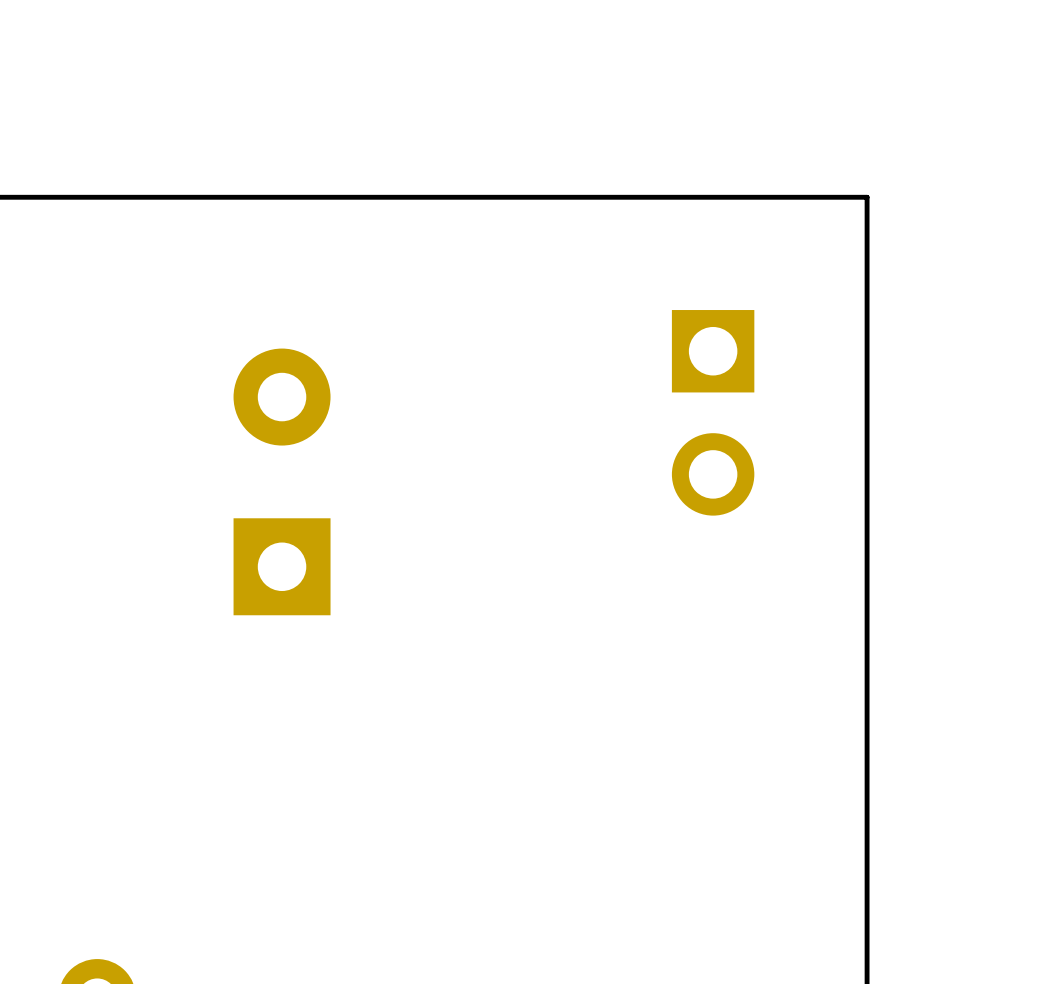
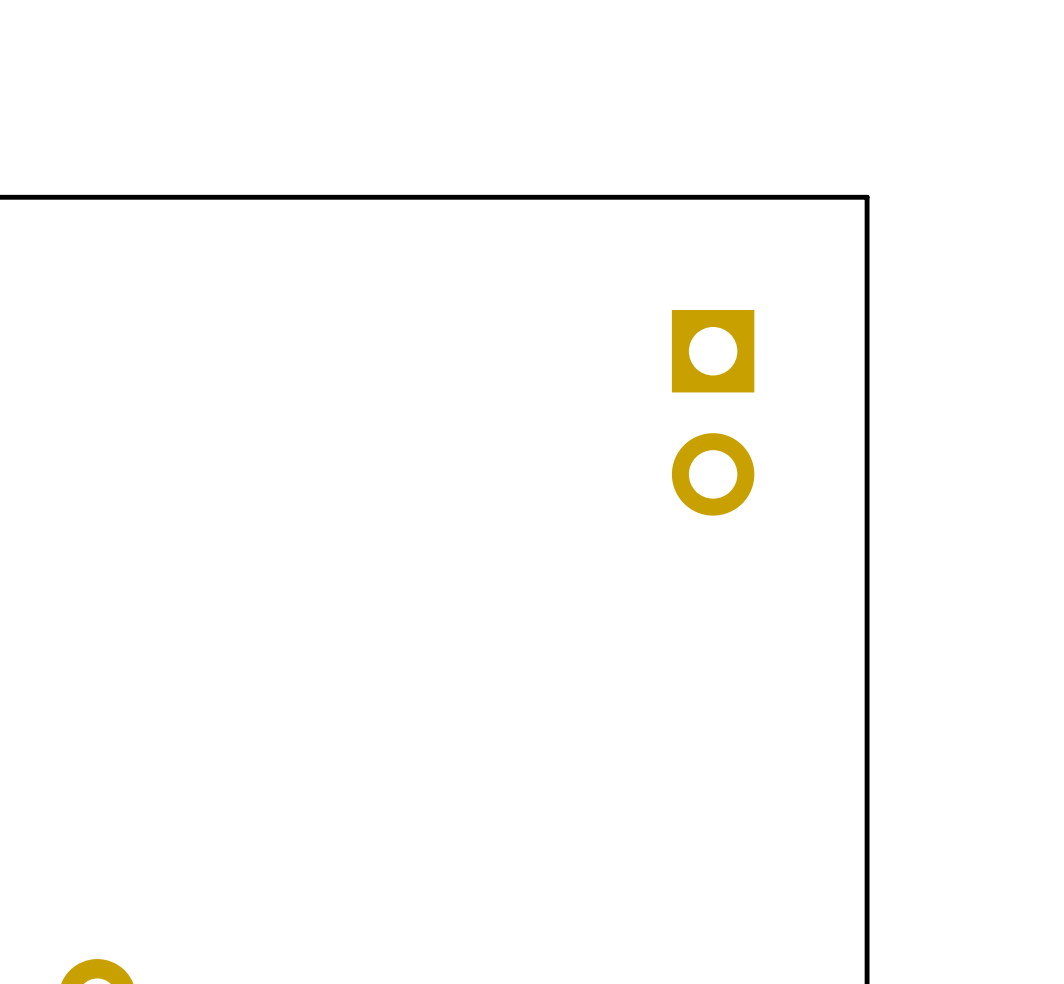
part: (282, 481) -> none

